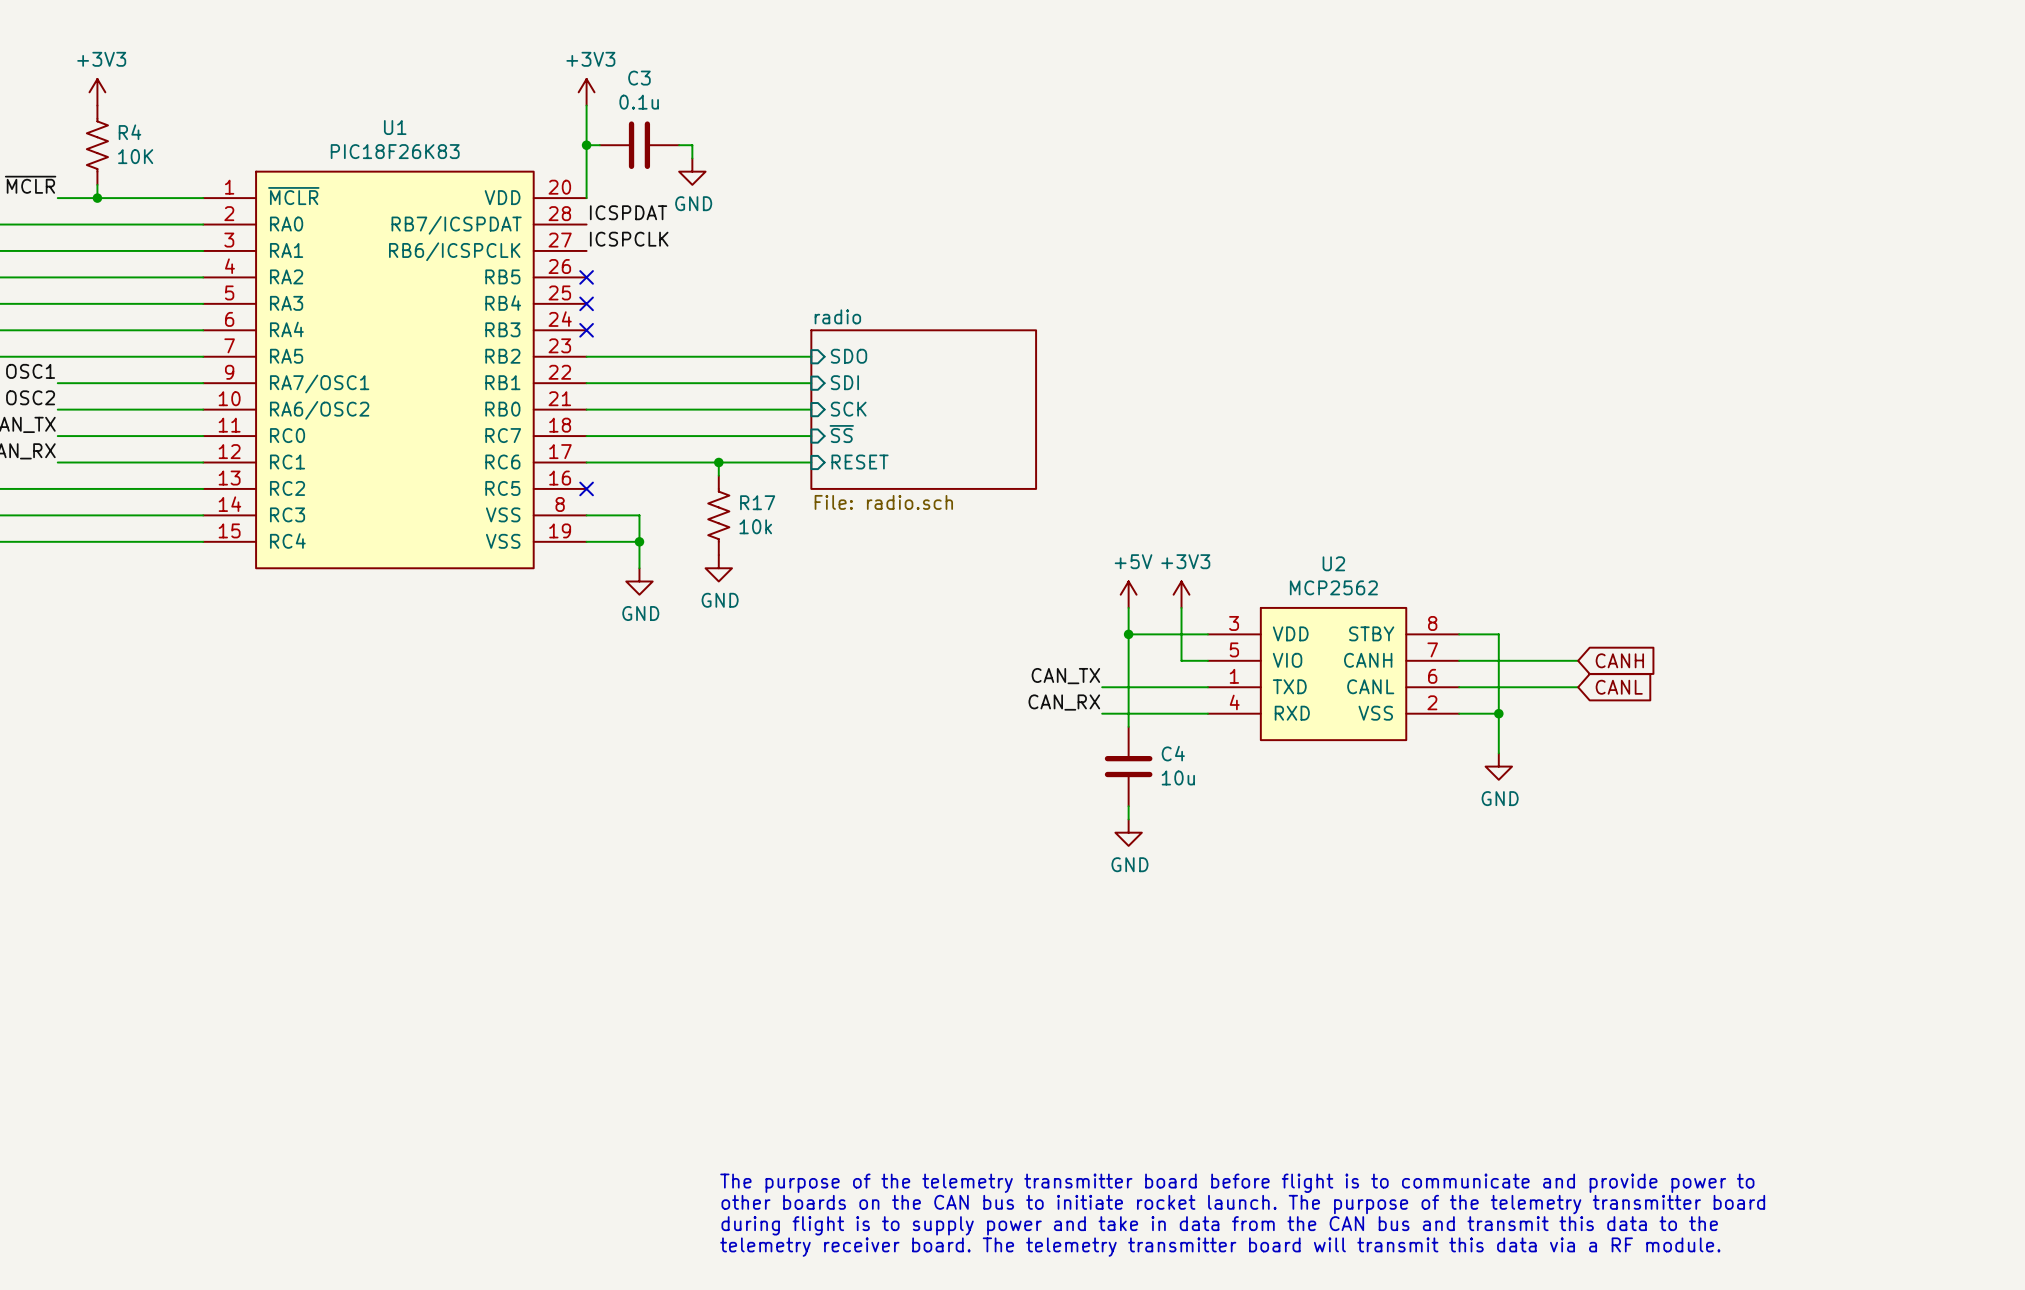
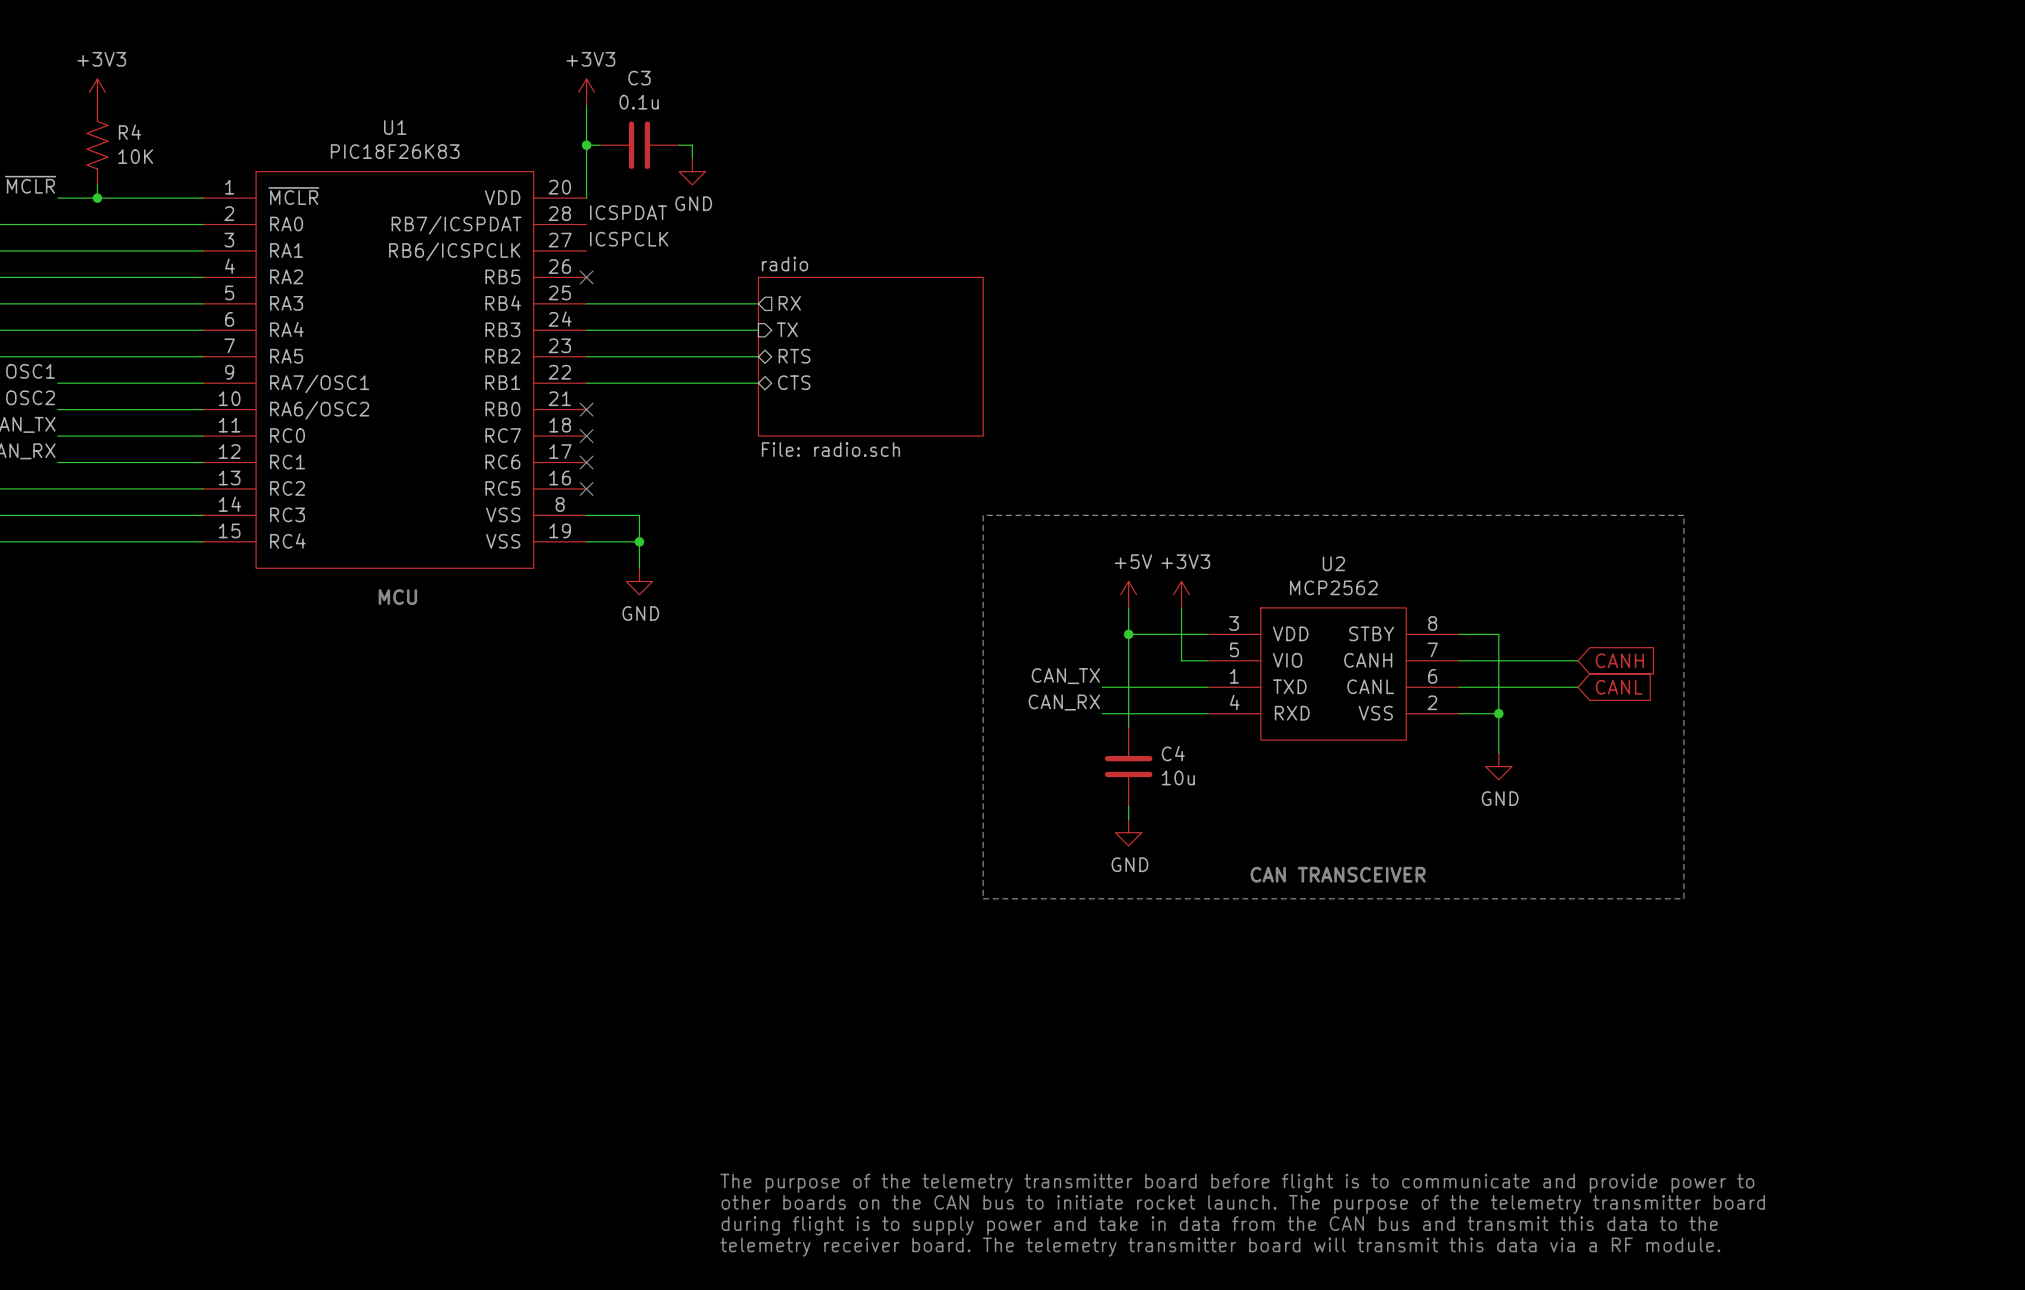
wire: none -> (586, 303) (758, 303)
no-connect mark: (586, 303) -> none
sheet pin: none -> RX (789, 303)
sheet pin: none -> TX (787, 329)
wire: none -> (586, 330) (758, 330)
no-connect mark: (586, 330) -> none
wire: (758, 356) (811, 356) -> none
sheet pin: none -> RTS (794, 356)
sheet pin: SDO (849, 356) -> none
sheet pin: none -> CTS (794, 382)
sheet pin: SDI (844, 382) -> none
wire: (758, 383) (811, 383) -> none
wire: (586, 409) (811, 409) -> none
no-connect mark: none -> (586, 409)
sheet pin: SCK (848, 409) -> none
sheet radio position: (923, 409) -> (870, 356)
sheet pin: ~{SS} (841, 434) -> none
wire: (586, 436) (811, 436) -> none
no-connect mark: none -> (586, 436)
wire: (586, 462) (811, 462) -> none
no-connect mark: none -> (586, 462)
wire: (718, 462) (718, 475) -> none
junction: (718, 462) -> none
sheet pin: RESET (860, 462) -> none
R17: 10k (718, 515) -> none
line: none -> (983, 515) (1683, 515) (1683, 898) (983, 898) (983, 515)
power symbol: GND (718, 568) -> none
text: none -> MCU (397, 597)
text: none -> CAN TRANSCEIVER (1338, 874)

